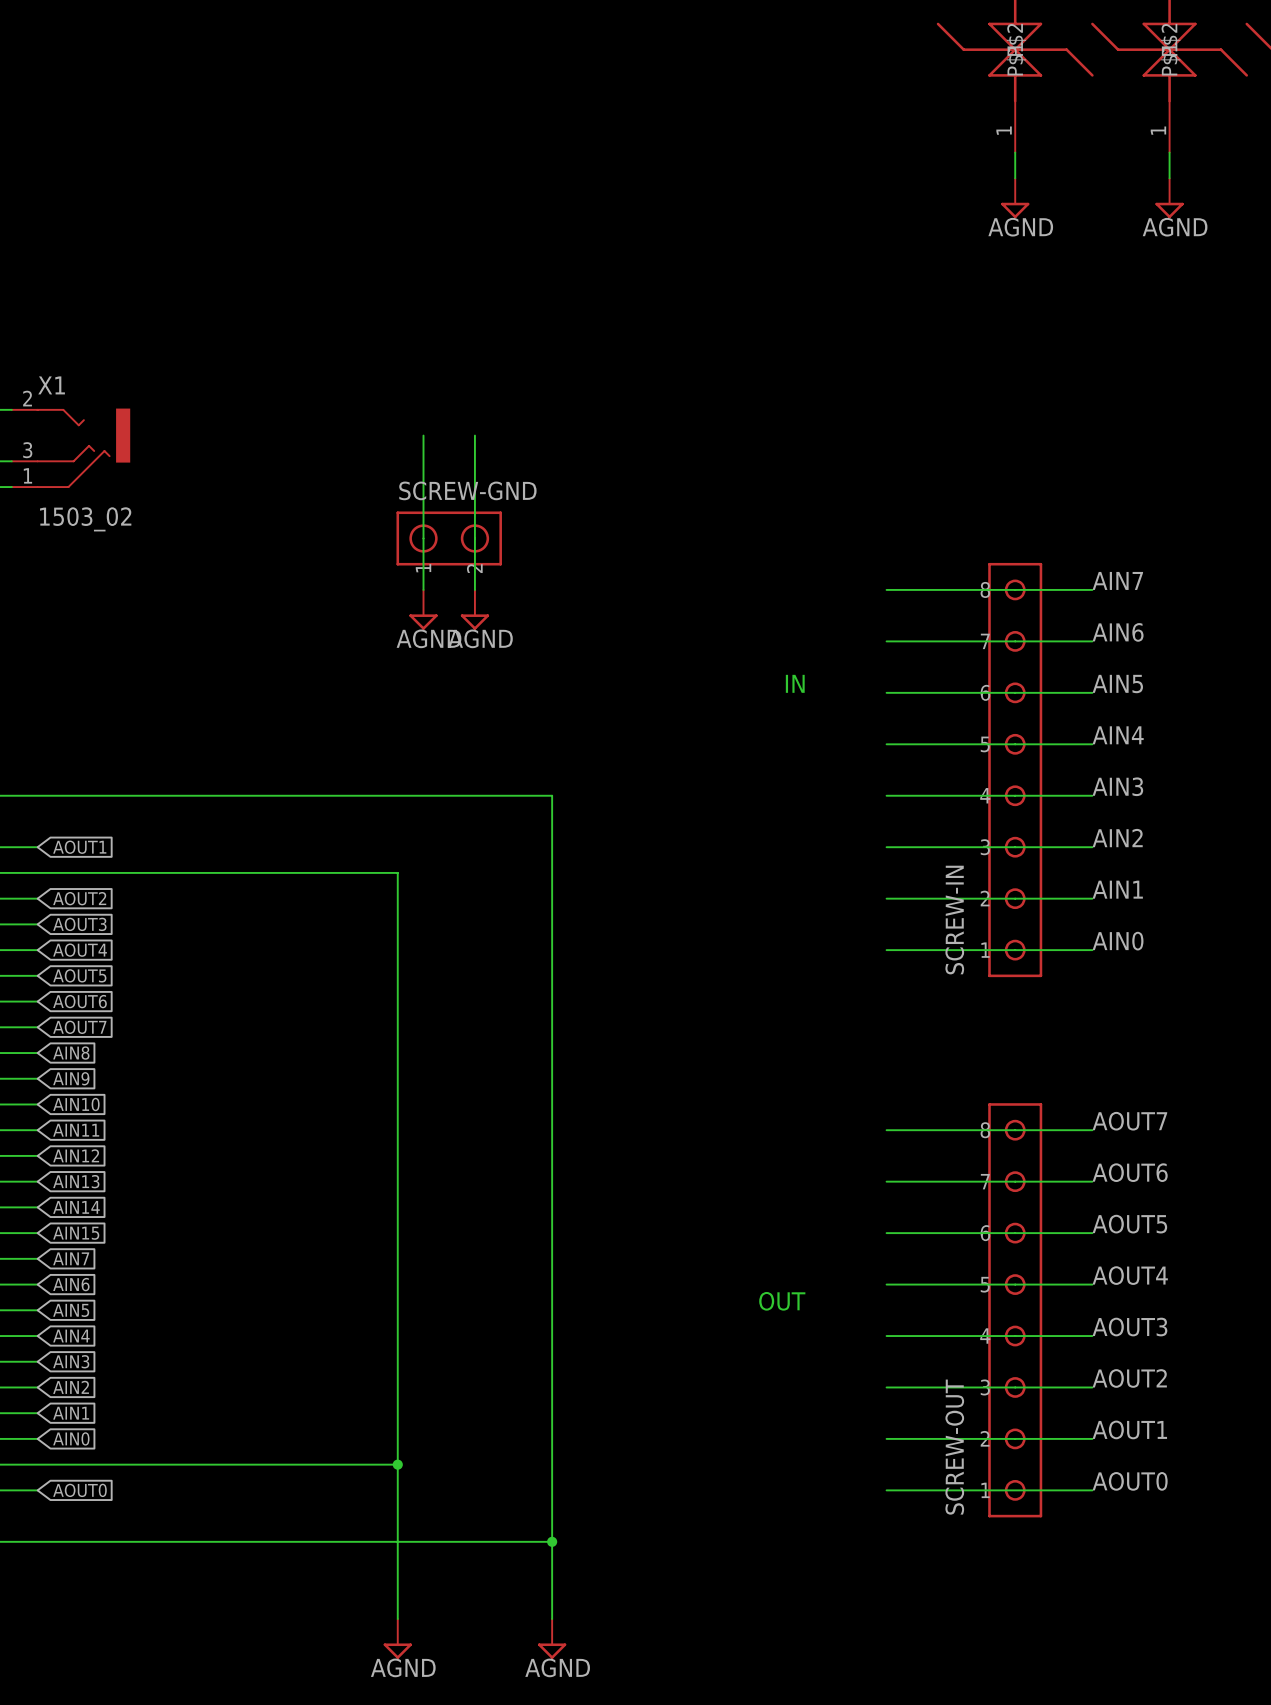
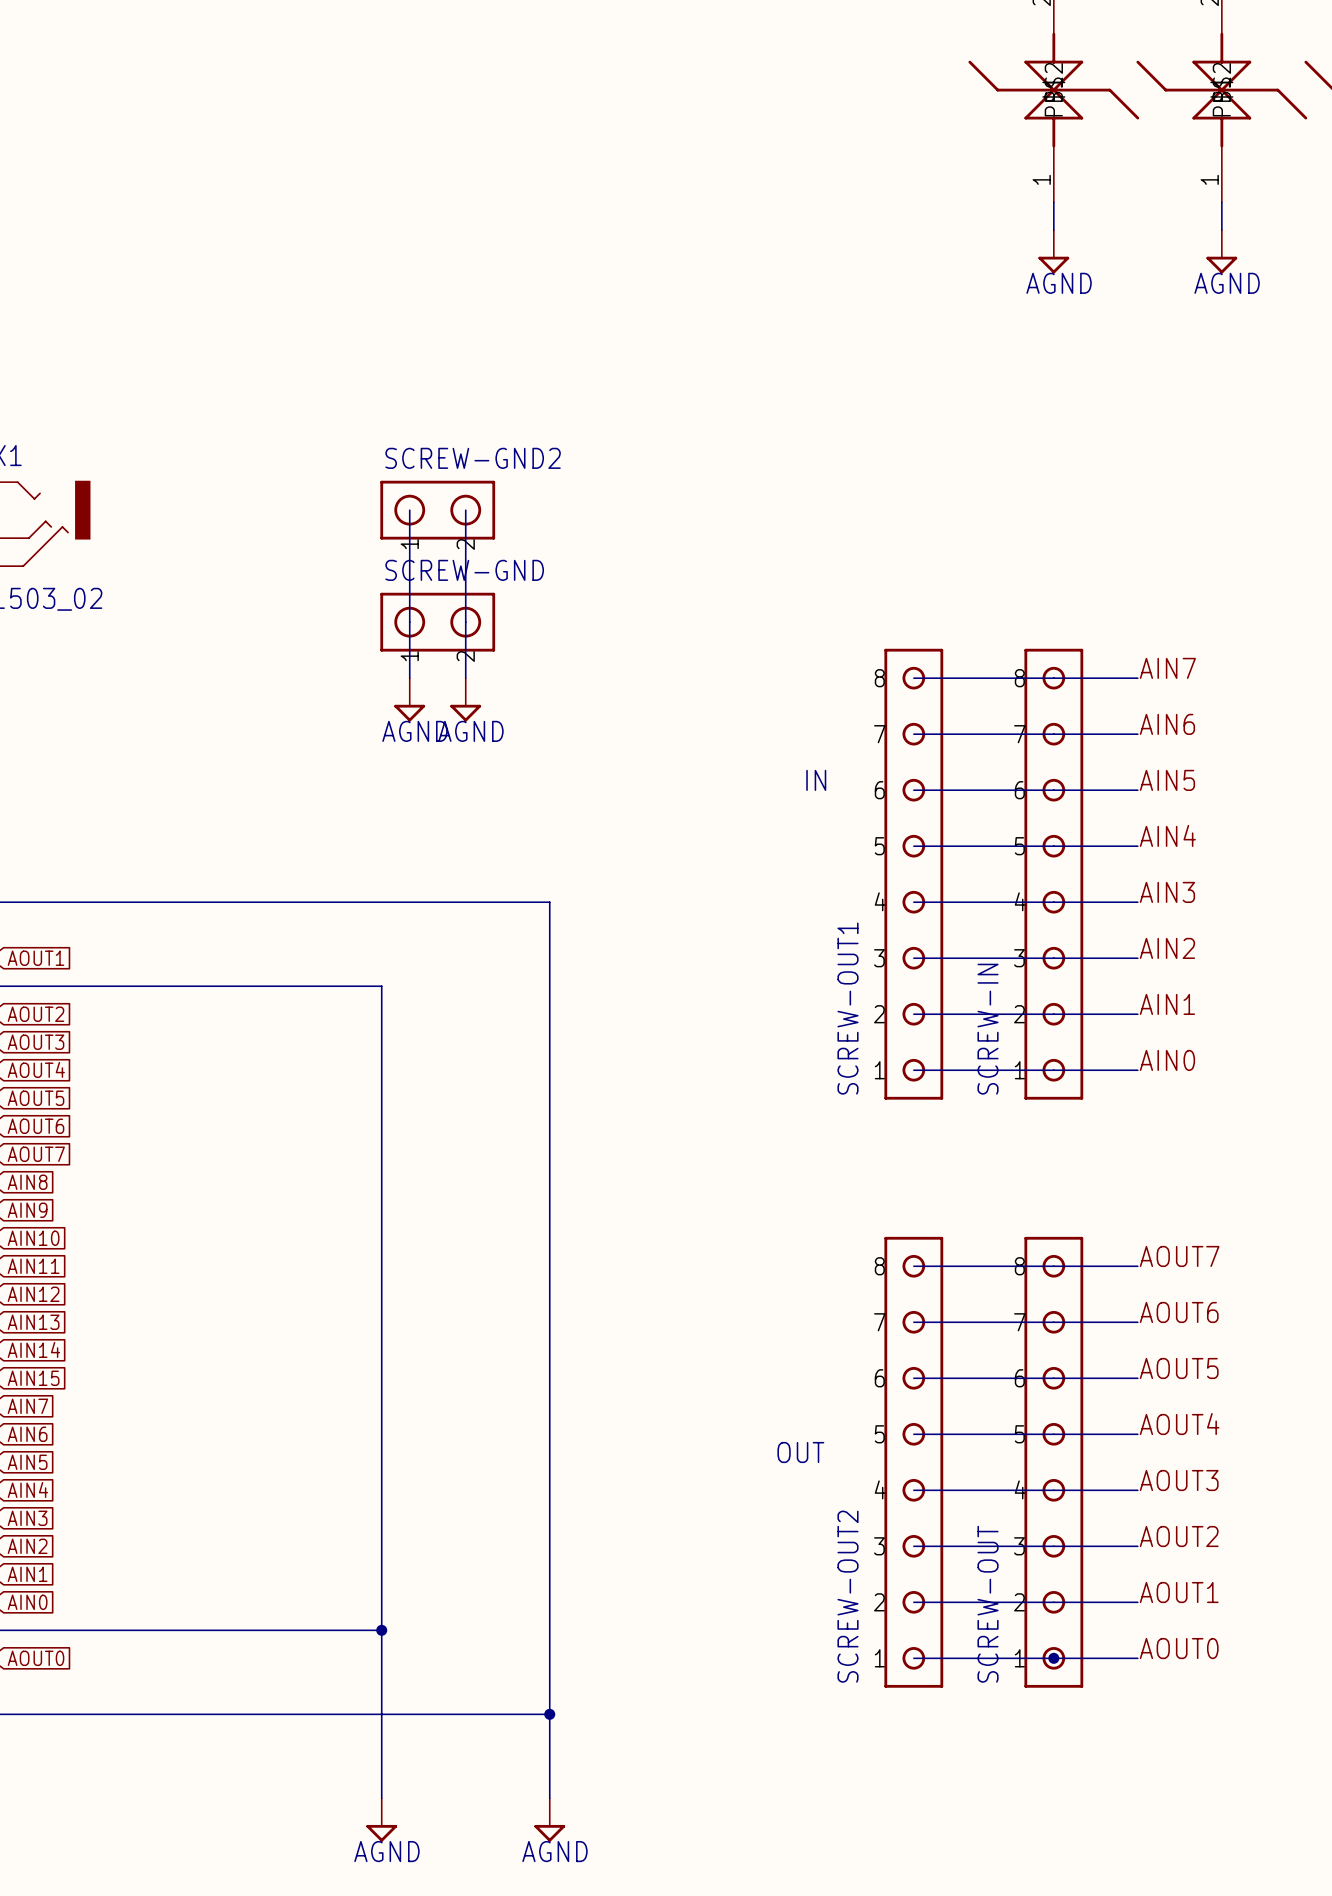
SCREW-GND2: none -> (437, 510)
SCREW-OUT1: none -> (913, 874)
SCREW-OUT2: none -> (913, 1462)
junction: none -> (1053, 1658)

